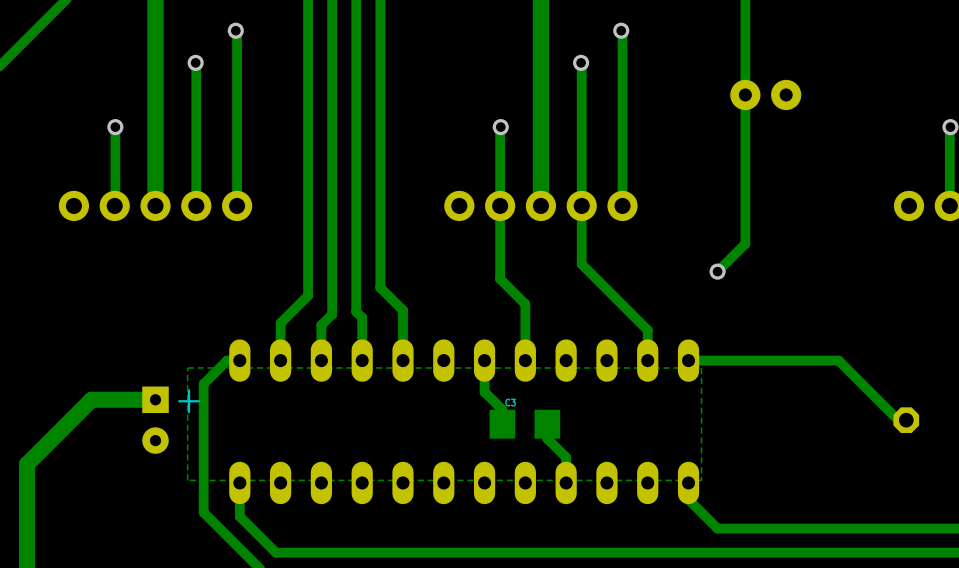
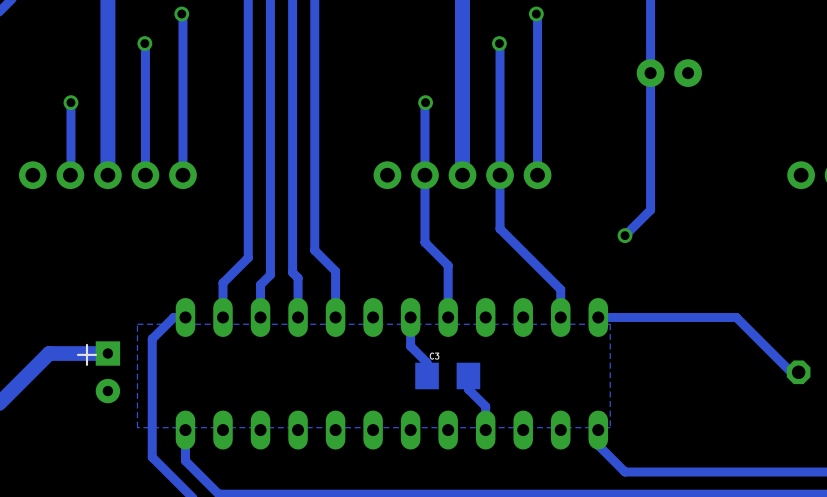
text position: + (188, 401) -> + (86, 354)

